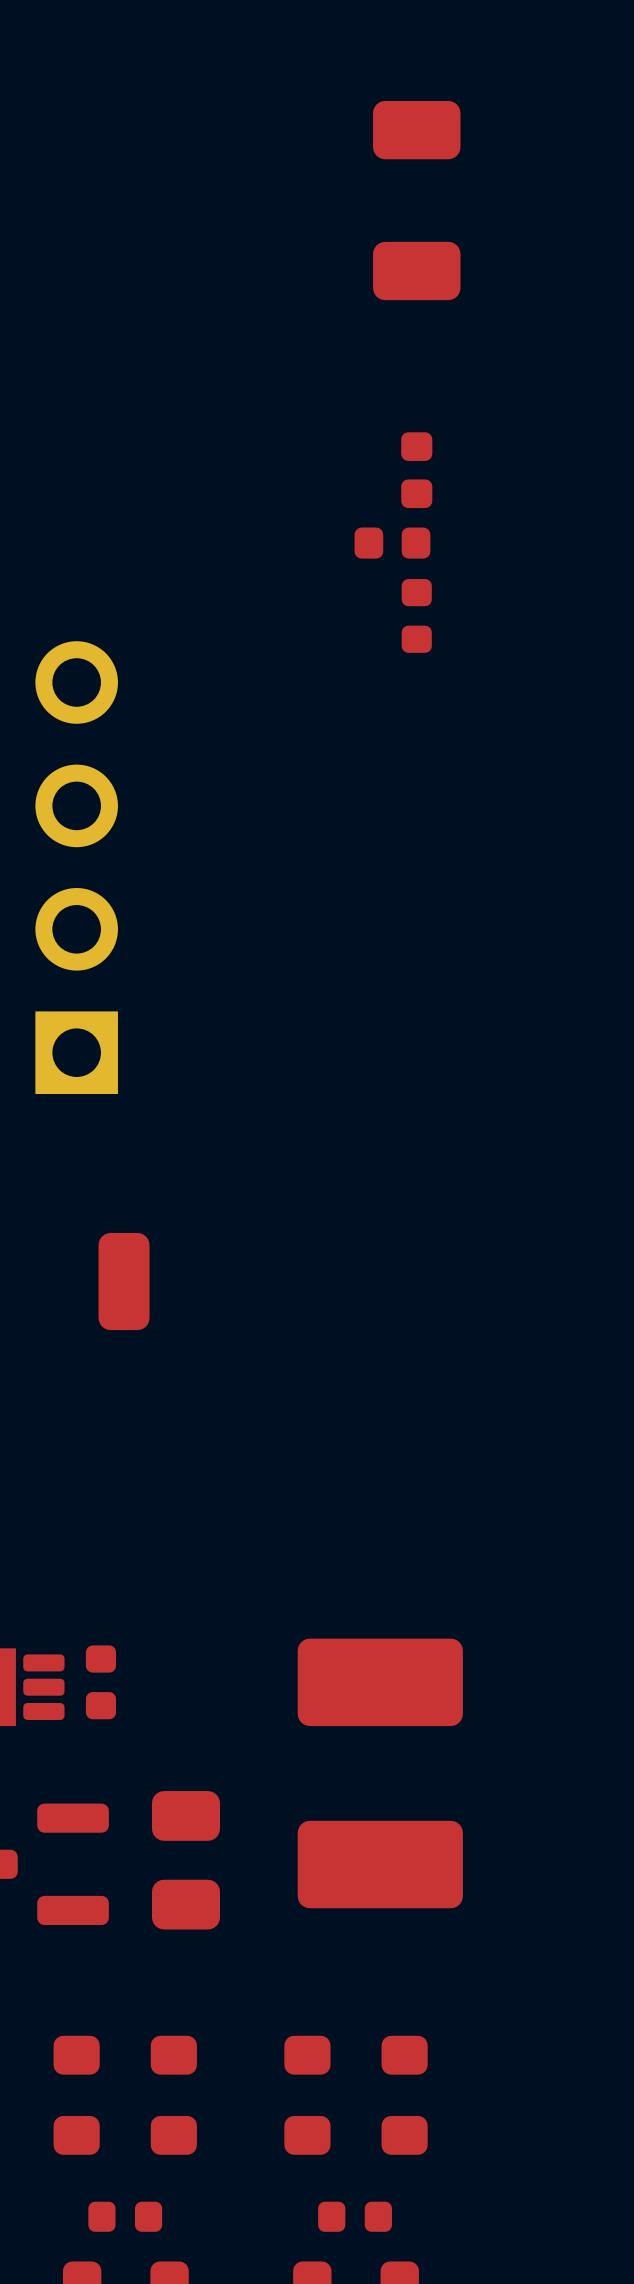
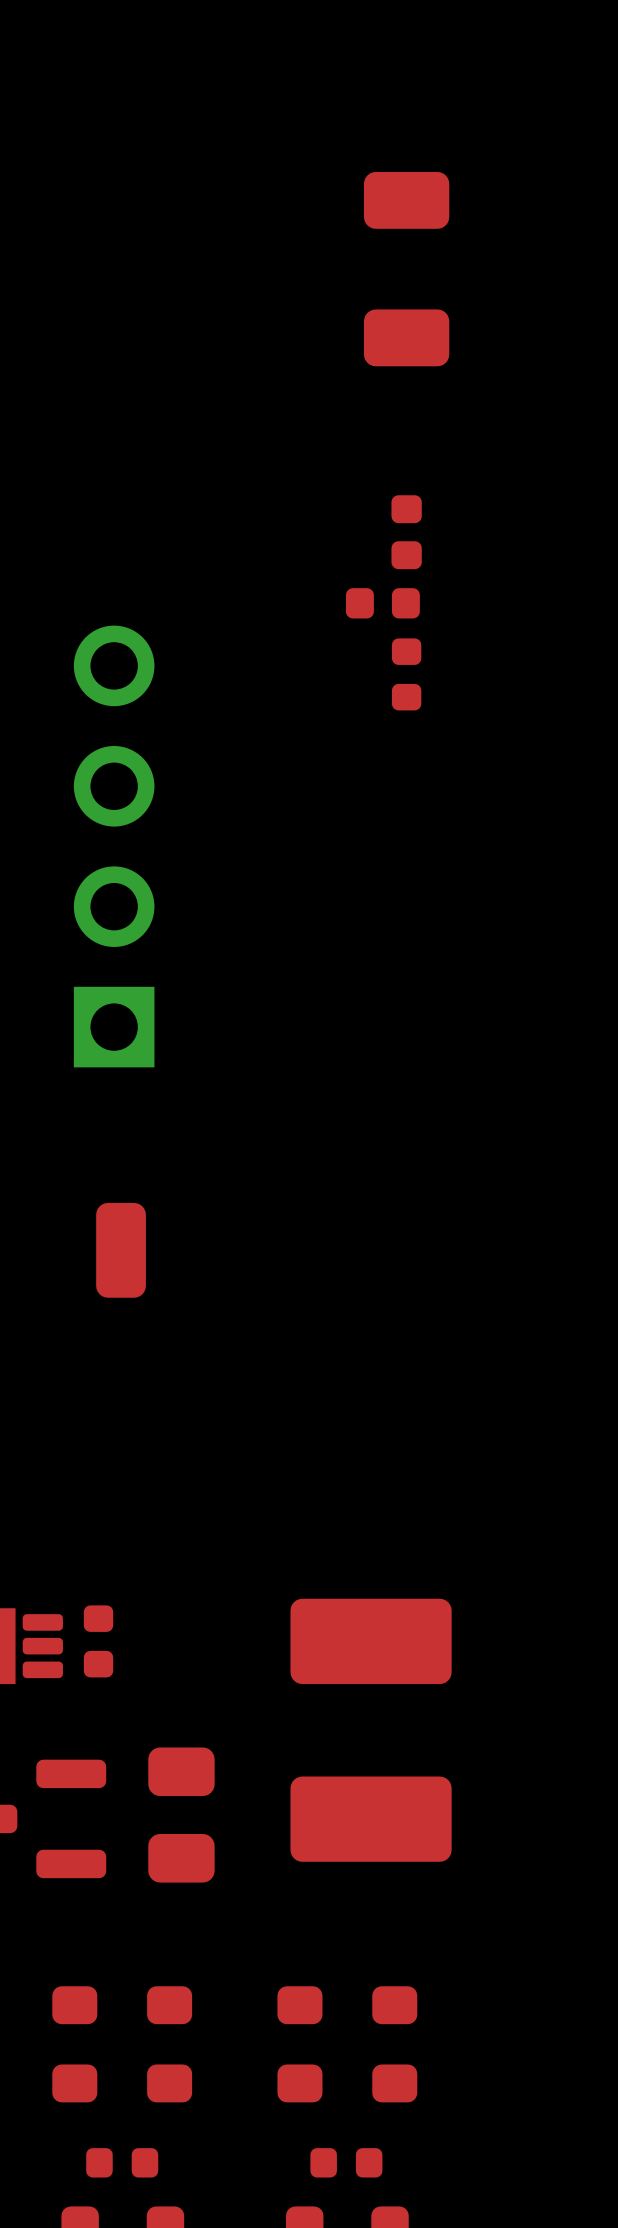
part position: (416, 200) -> (406, 269)
part: (416, 470) -> none
part rotation: 0° (392, 543) -> 90° clockwise (406, 532)
part footprint: [401, 579, 432, 653] -> [345, 588, 420, 619]
part: none -> (406, 674)
part position: (76, 867) -> (114, 846)

